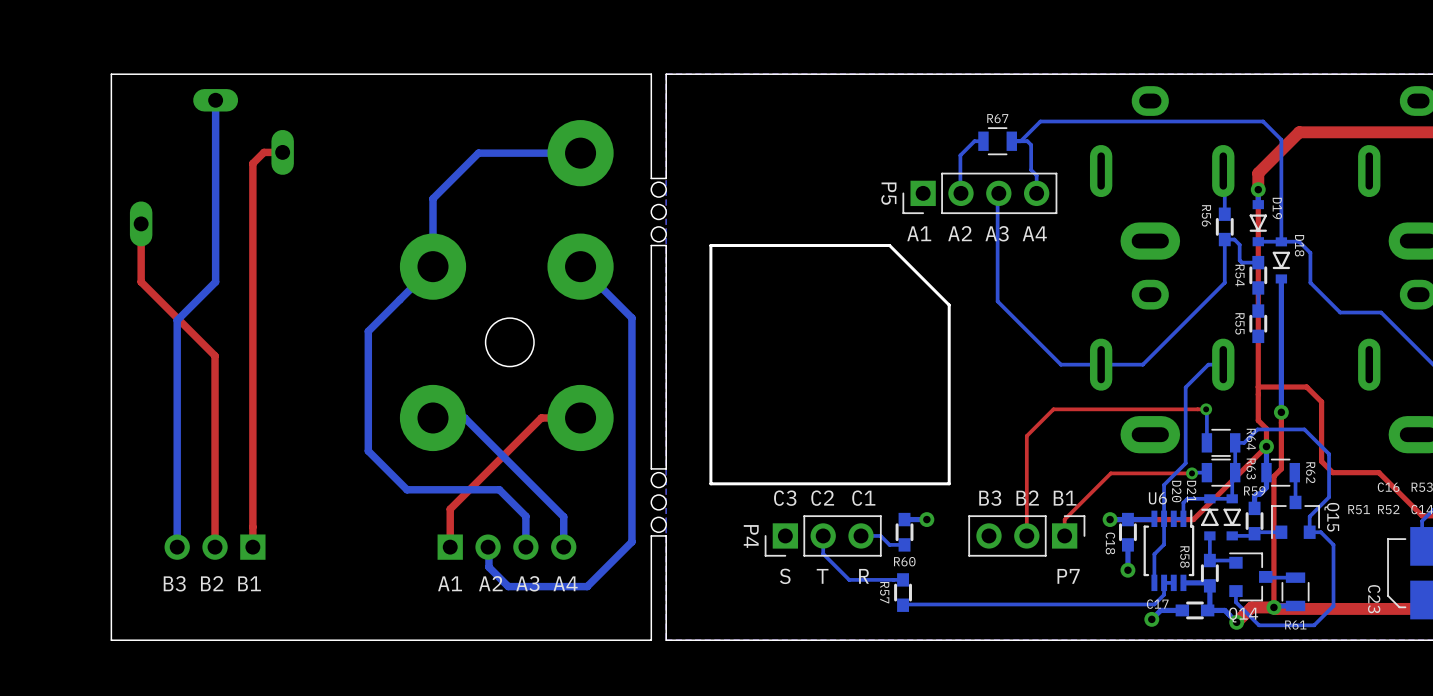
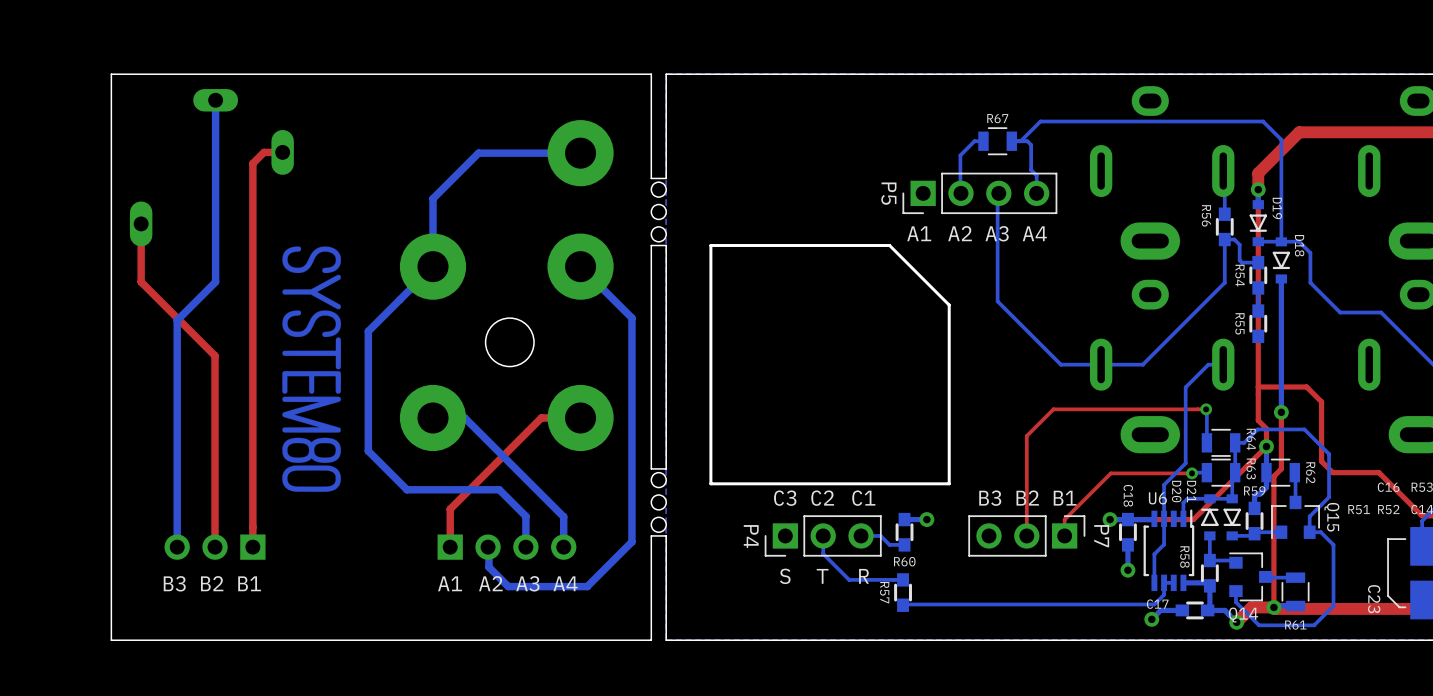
drawing: none -> [282, 246, 341, 492]
C18 name position: C18 (1110, 543) -> C18 (1128, 495)
P7 name rotation: 0° (1068, 576) -> 90° clockwise (1101, 536)
P7 name position: P7 (1068, 576) -> P7 (1101, 536)

